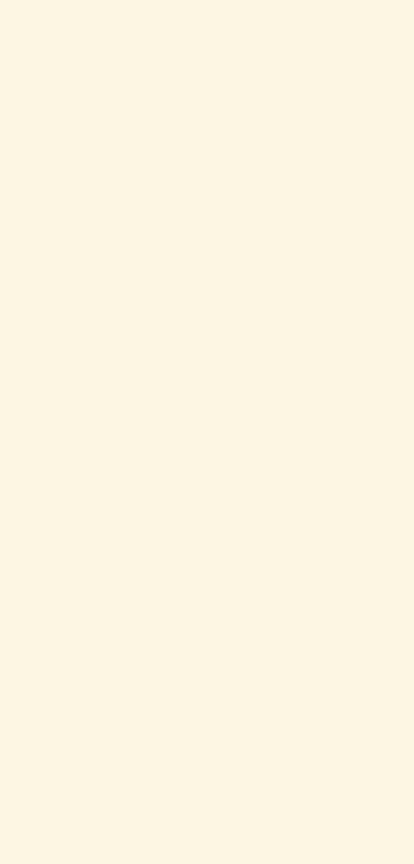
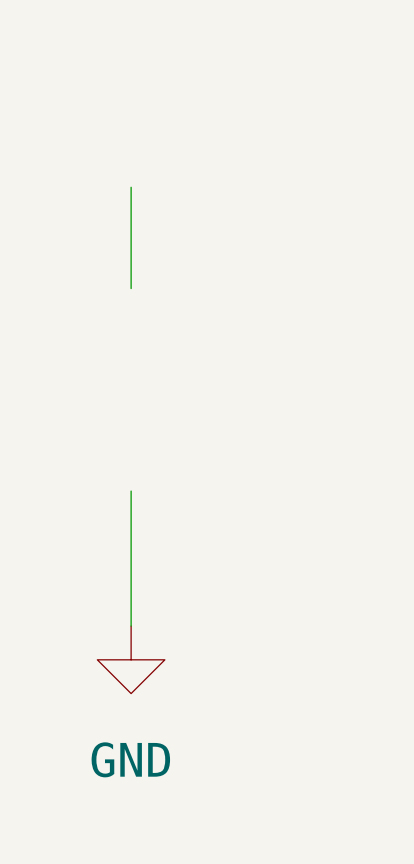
wire: none -> (131, 187) (131, 288)
wire: none -> (131, 491) (131, 626)
power symbol: none -> GND (131, 659)

